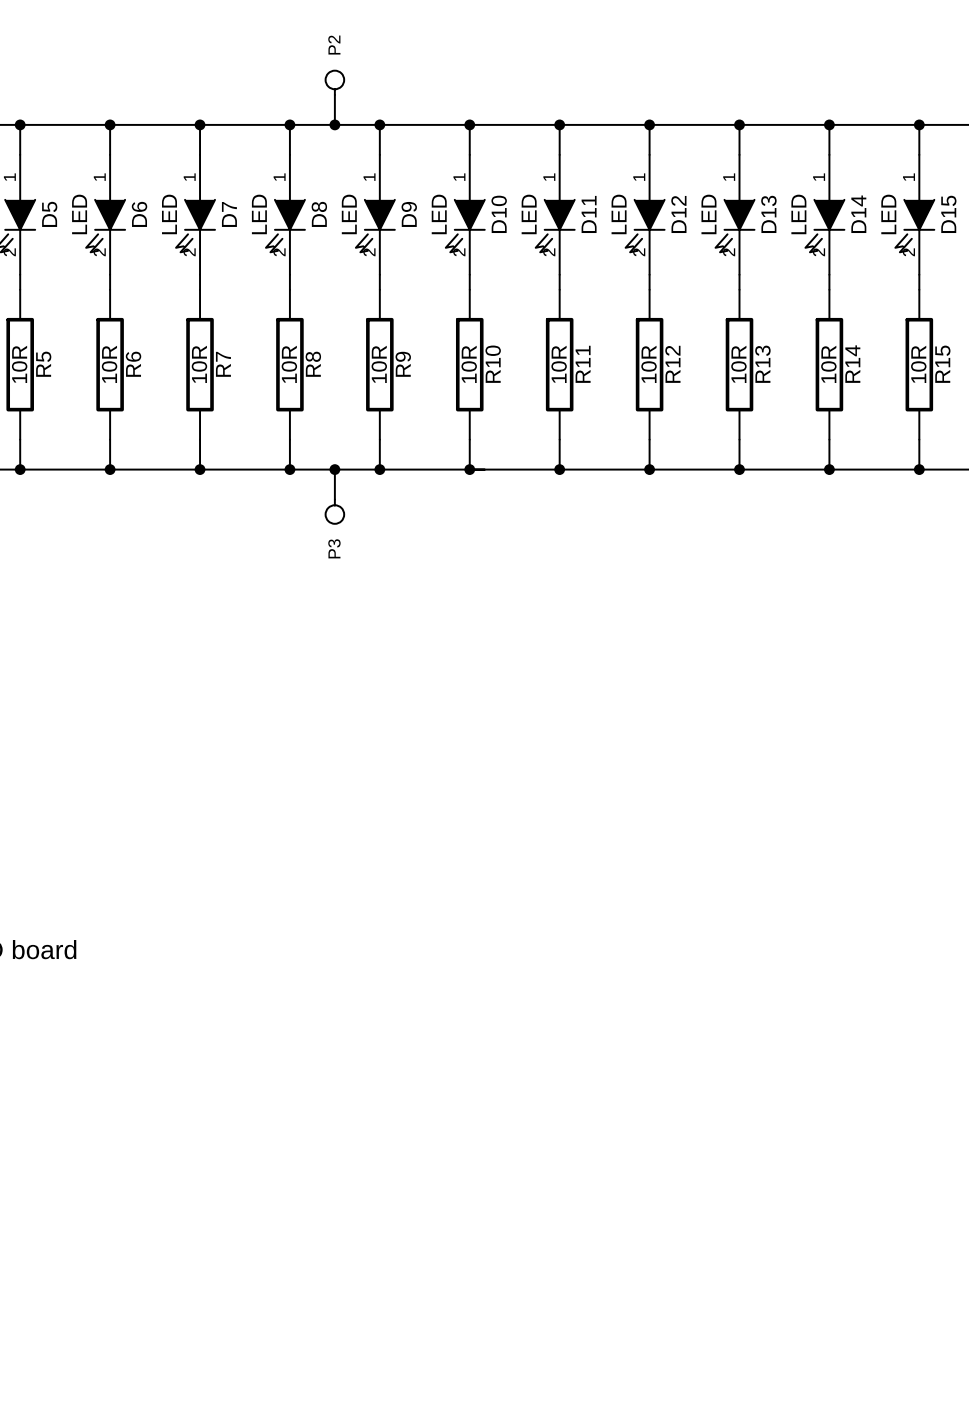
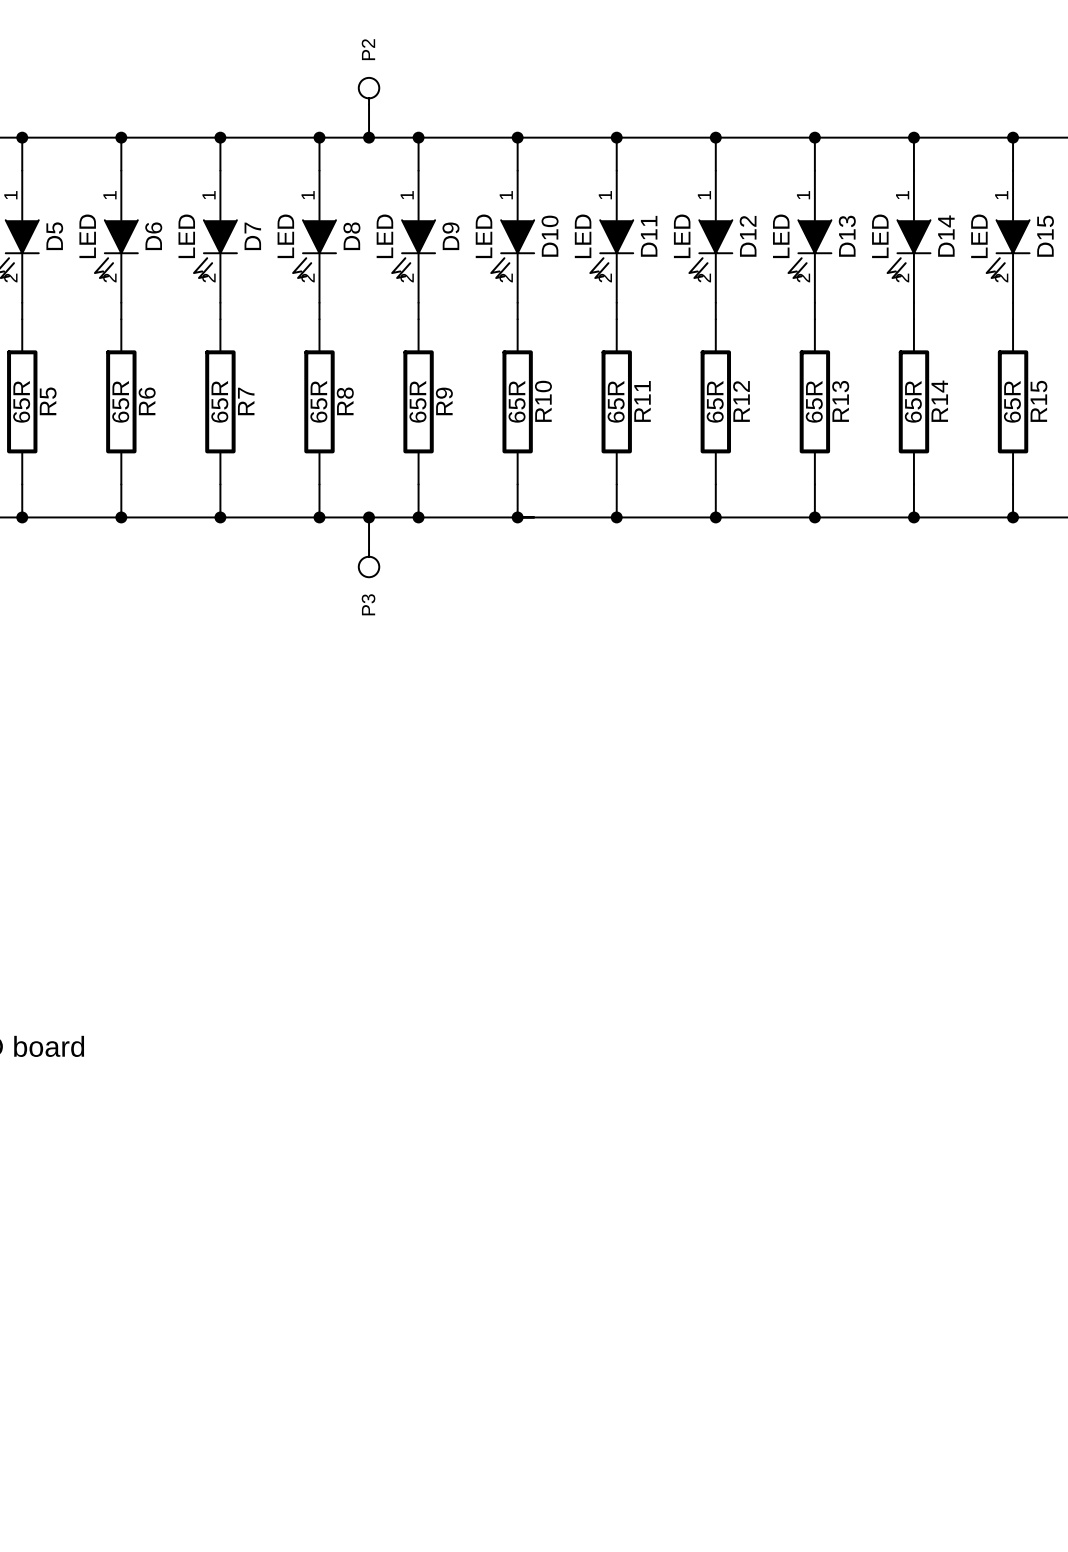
R5 value: 10R (19, 364) -> 65R (21, 401)
R6 value: 10R (109, 364) -> 65R (120, 401)
R7 value: 10R (199, 364) -> 65R (219, 401)
R8 value: 10R (289, 364) -> 65R (318, 401)
R9 value: 10R (379, 364) -> 65R (417, 401)
R10 value: 10R (469, 364) -> 65R (517, 401)
R11 value: 10R (559, 364) -> 65R (616, 401)
R12 value: 10R (649, 364) -> 65R (715, 401)
R13 value: 10R (738, 364) -> 65R (814, 401)
R14 value: 10R (828, 364) -> 65R (913, 401)
R15 value: 10R (918, 364) -> 65R (1012, 401)

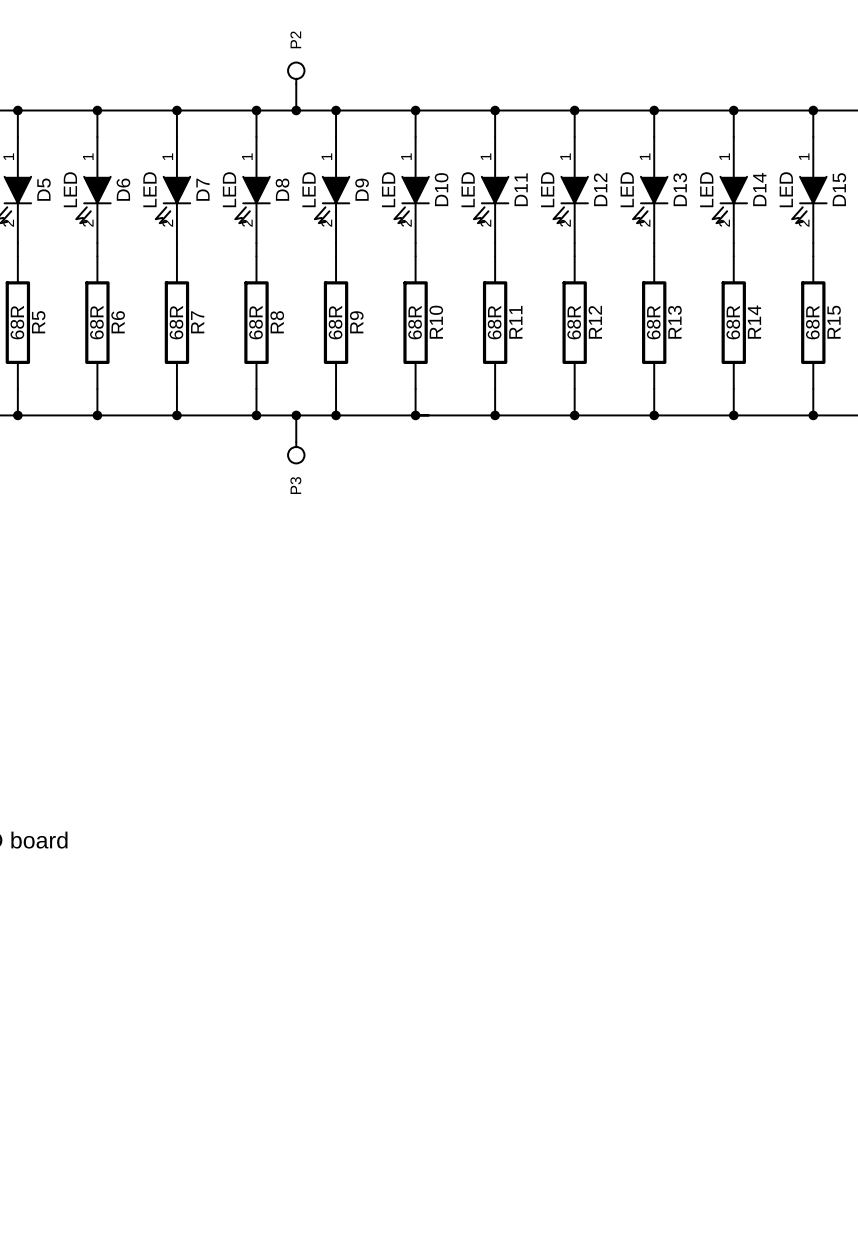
R5 value: 65R (21, 401) -> 68R (17, 322)
R6 value: 65R (120, 401) -> 68R (96, 322)
R7 value: 65R (219, 401) -> 68R (176, 322)
R8 value: 65R (318, 401) -> 68R (255, 322)
R9 value: 65R (417, 401) -> 68R (335, 322)
R10 value: 65R (517, 401) -> 68R (415, 322)
R11 value: 65R (616, 401) -> 68R (494, 322)
R12 value: 65R (715, 401) -> 68R (574, 322)
R13 value: 65R (814, 401) -> 68R (653, 322)
R14 value: 65R (913, 401) -> 68R (733, 322)
R15 value: 65R (1012, 401) -> 68R (812, 322)

